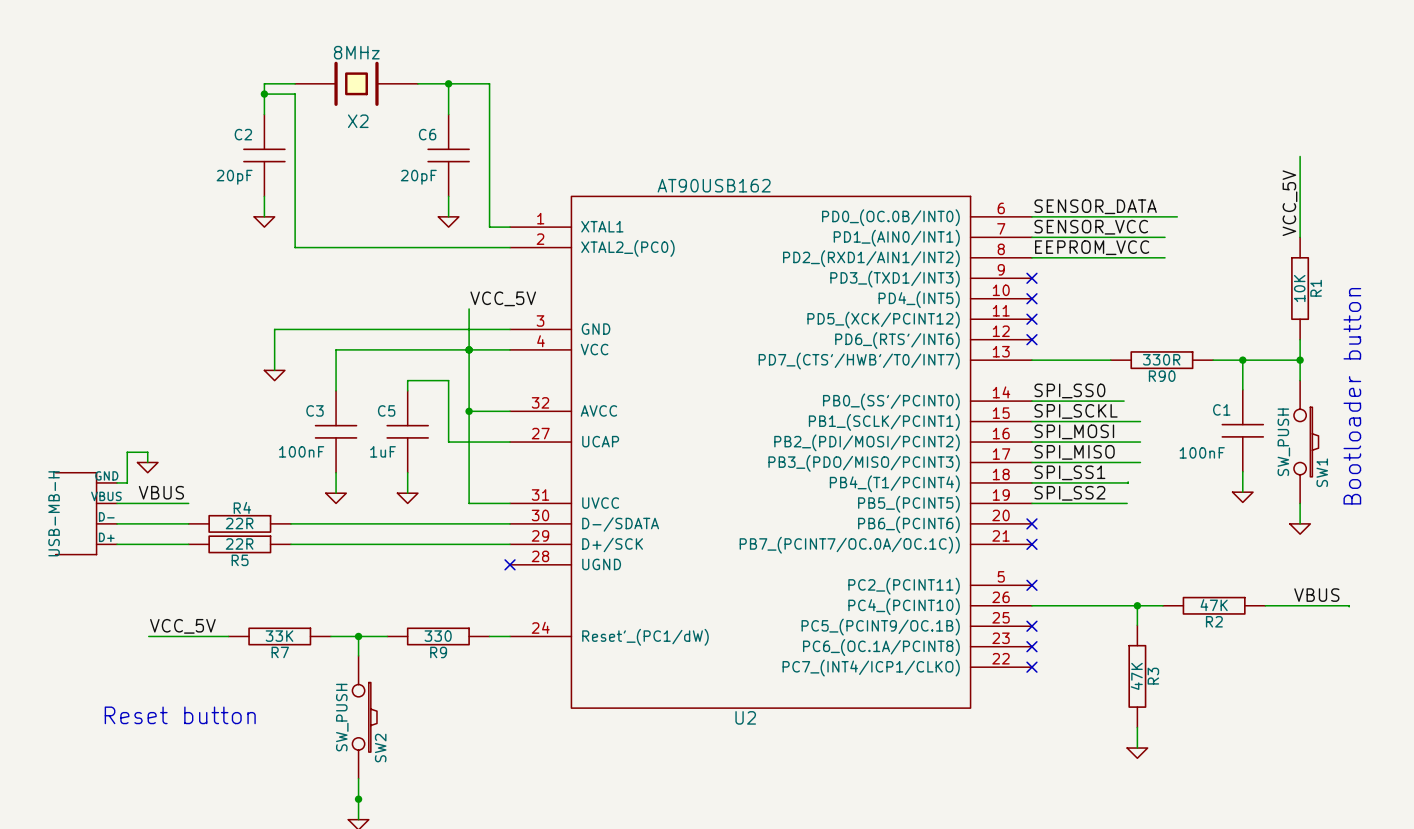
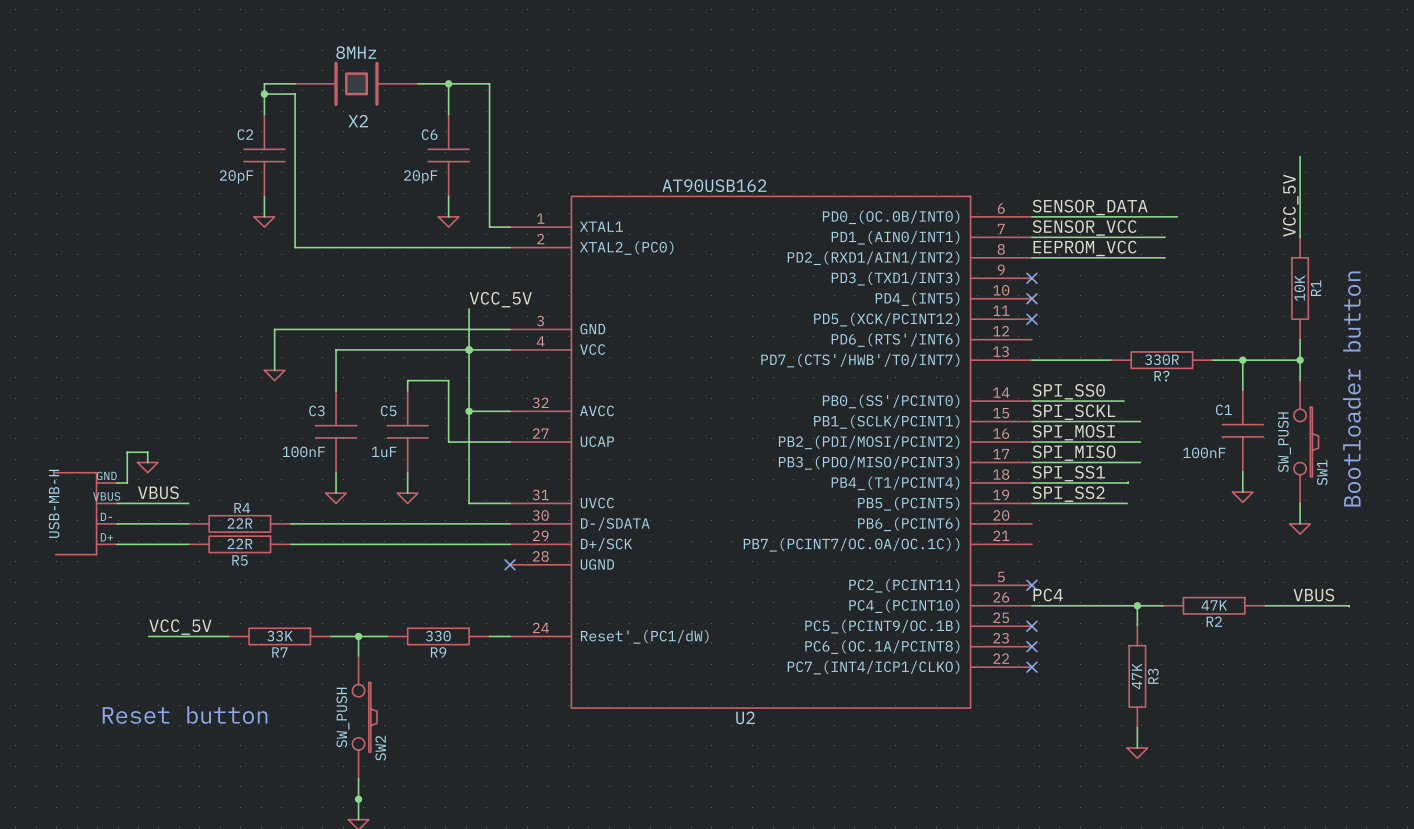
no-connect mark: (1031, 339) -> none
R90 name: R90 (1162, 376) -> R? (1161, 376)
no-connect mark: (1031, 523) -> none
no-connect mark: (1031, 544) -> none
label: none -> PC4 (1048, 595)

